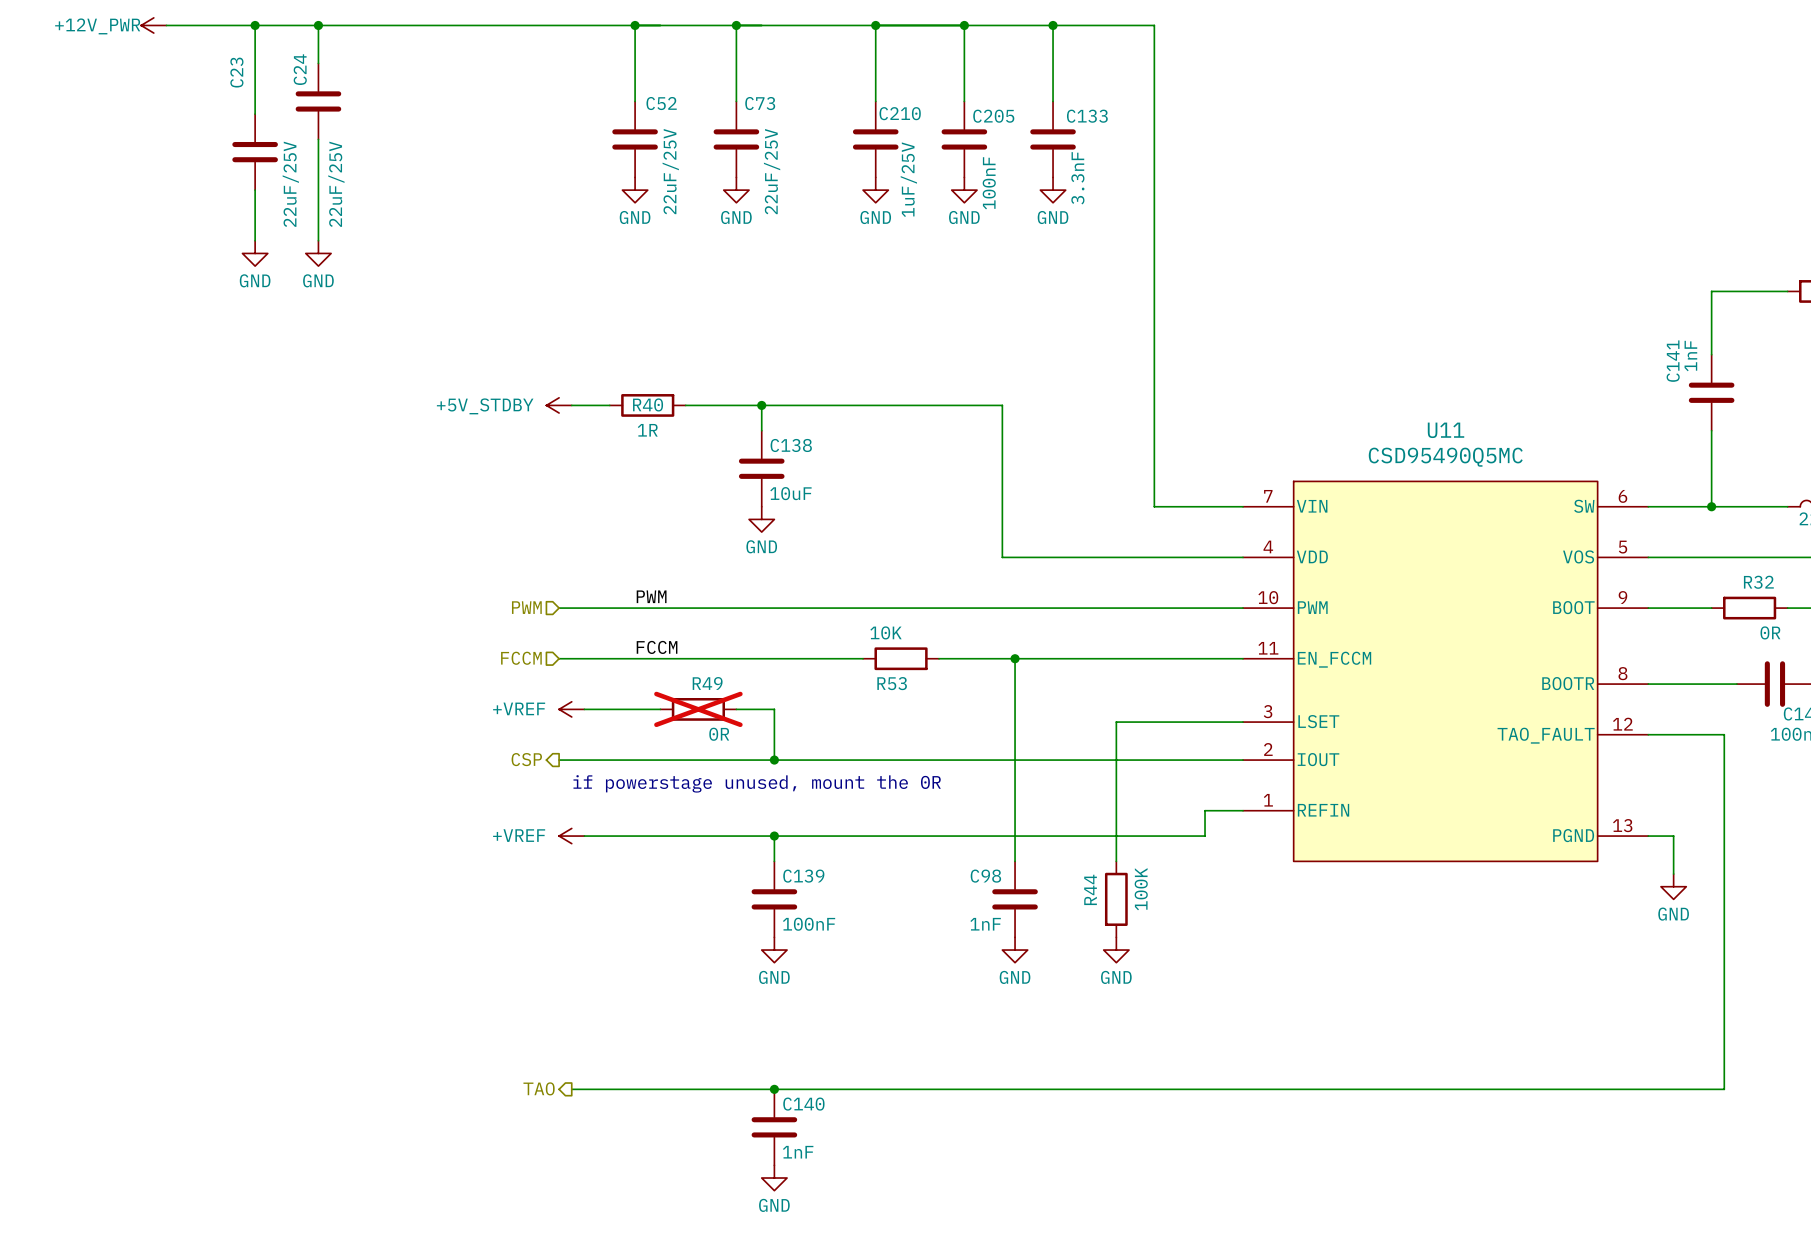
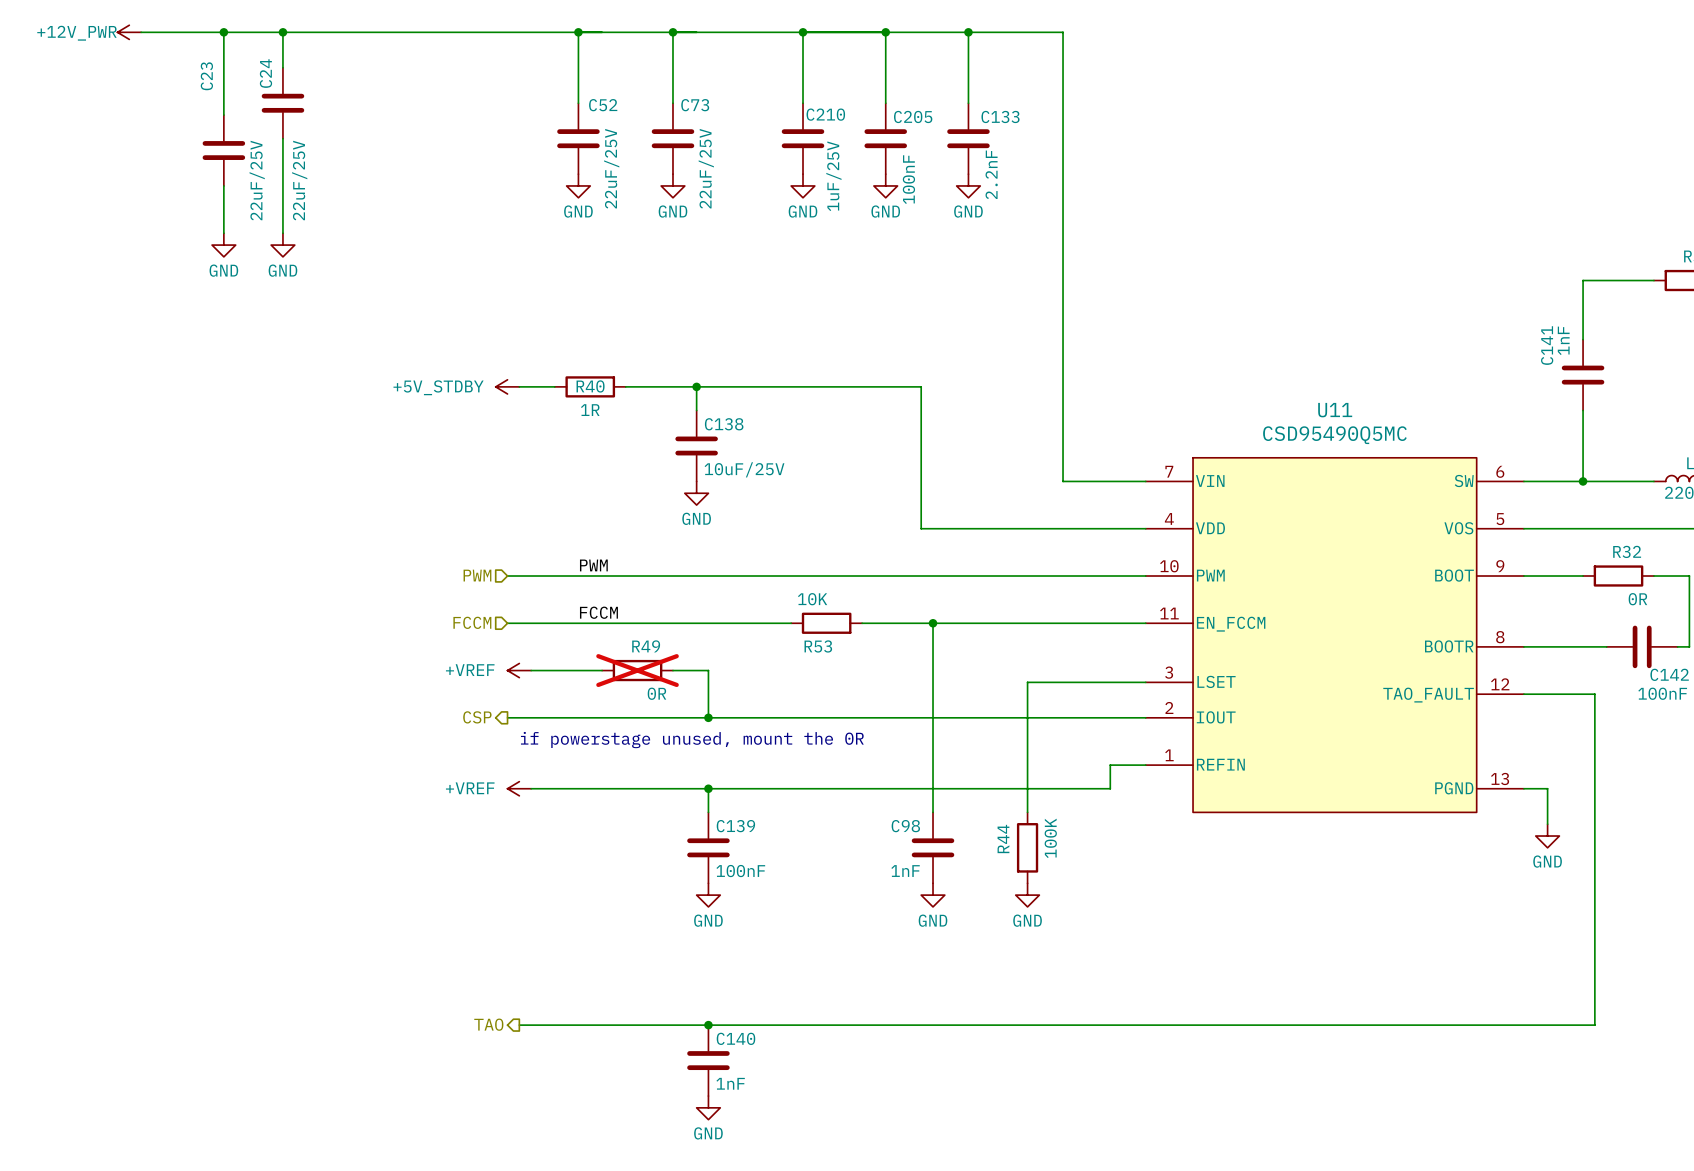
C133 value: 3.3nF (1077, 178) -> 2.2nF (991, 174)
C138 value: 10uF (790, 493) -> 10uF/25V (744, 469)

